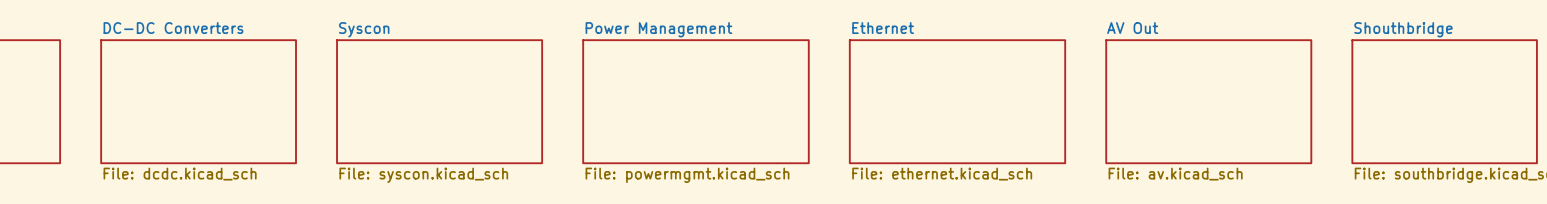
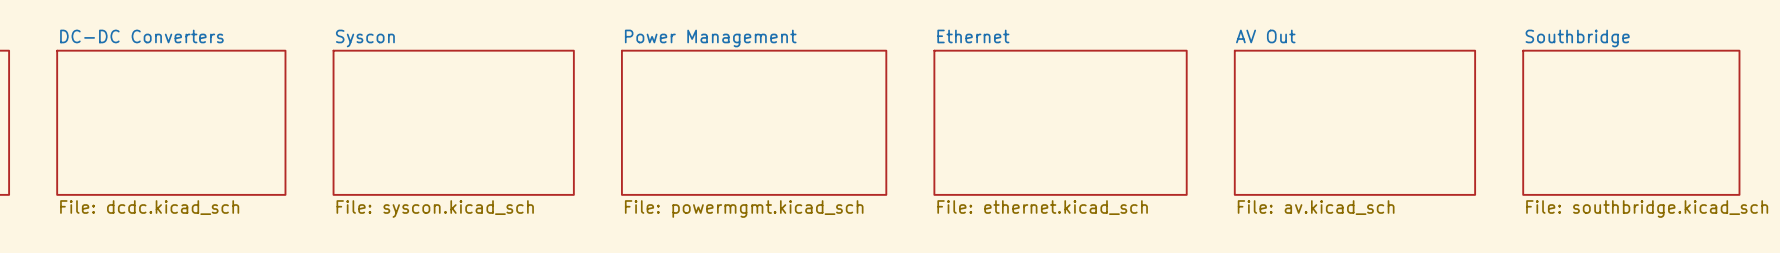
sheet Shouthbridge name: Shouthbridge (1403, 29) -> Southbridge (1577, 38)

